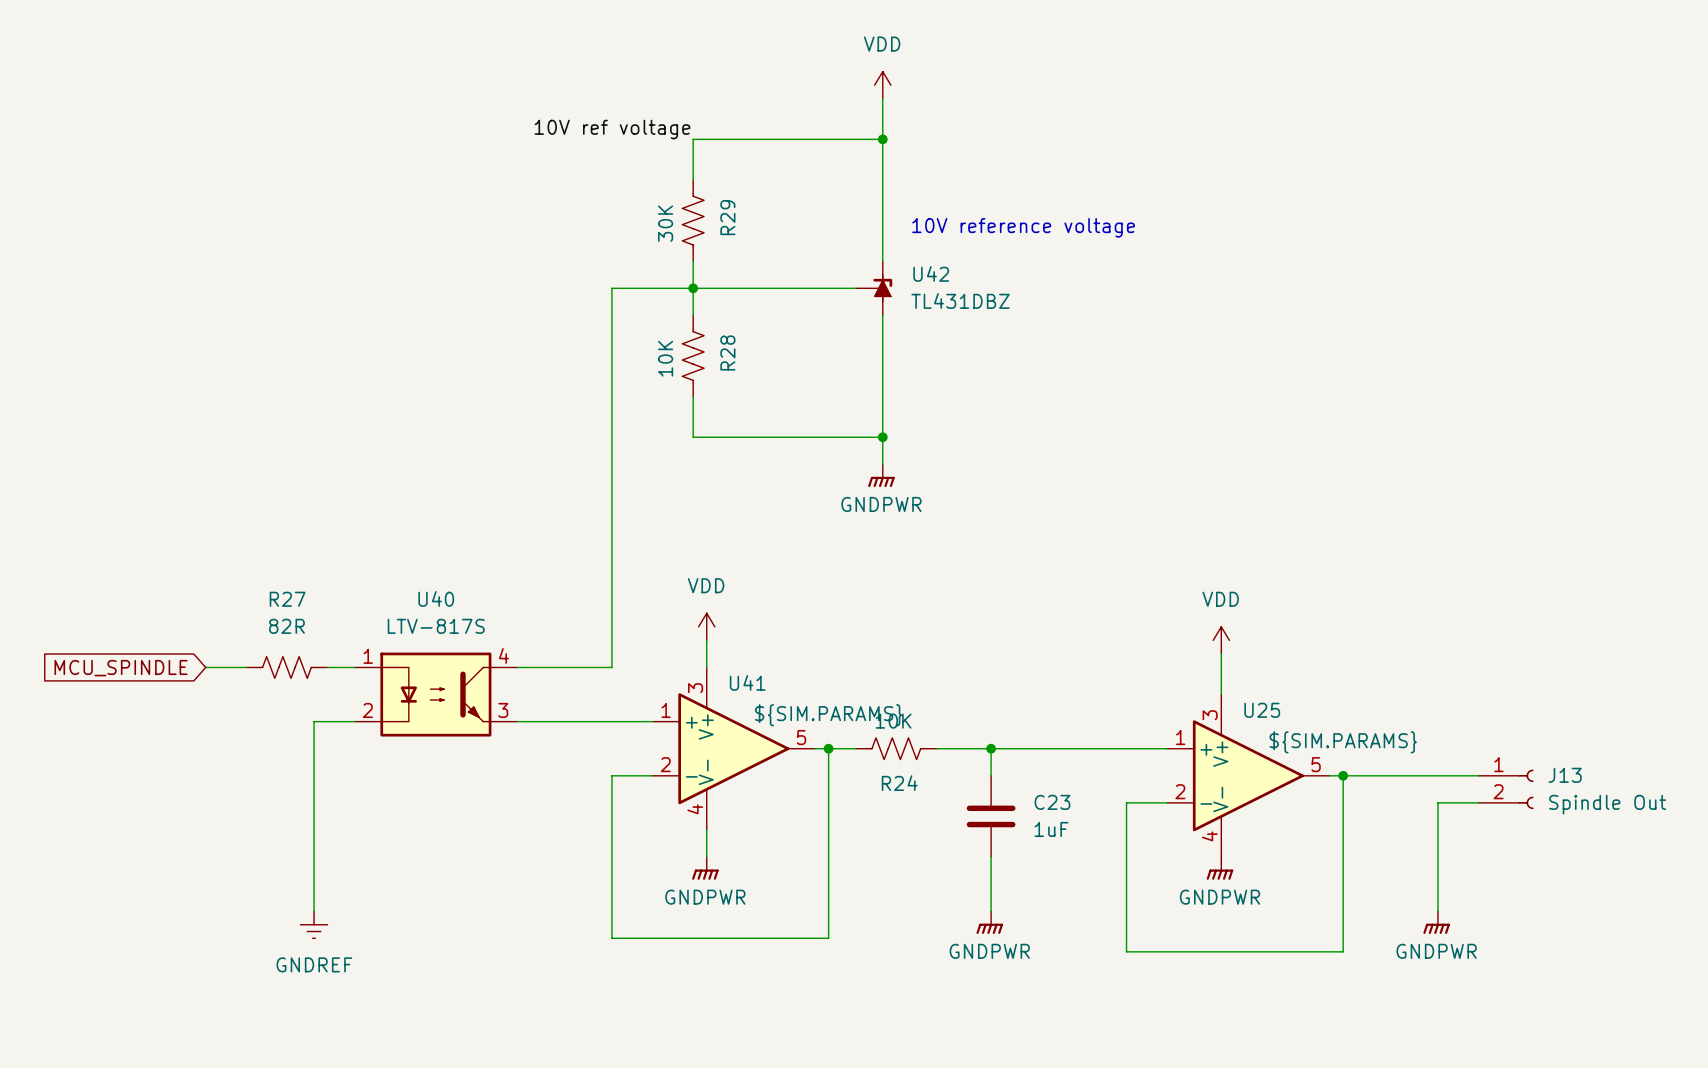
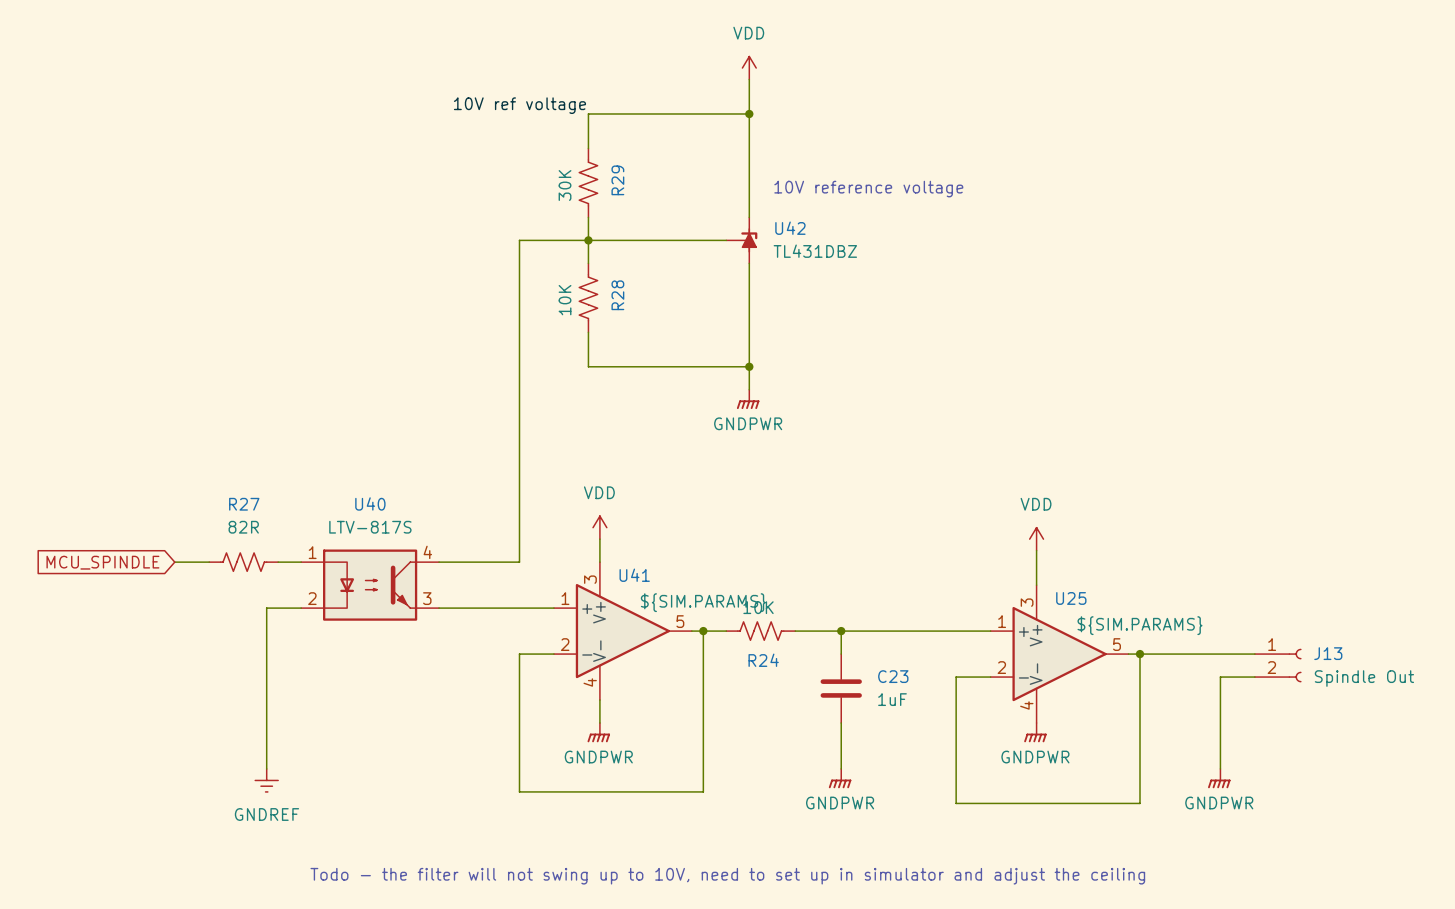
text: none -> Todo - the filter will not swing up to 10V, need to set up in simulator and adjust the ceiling (727, 876)

